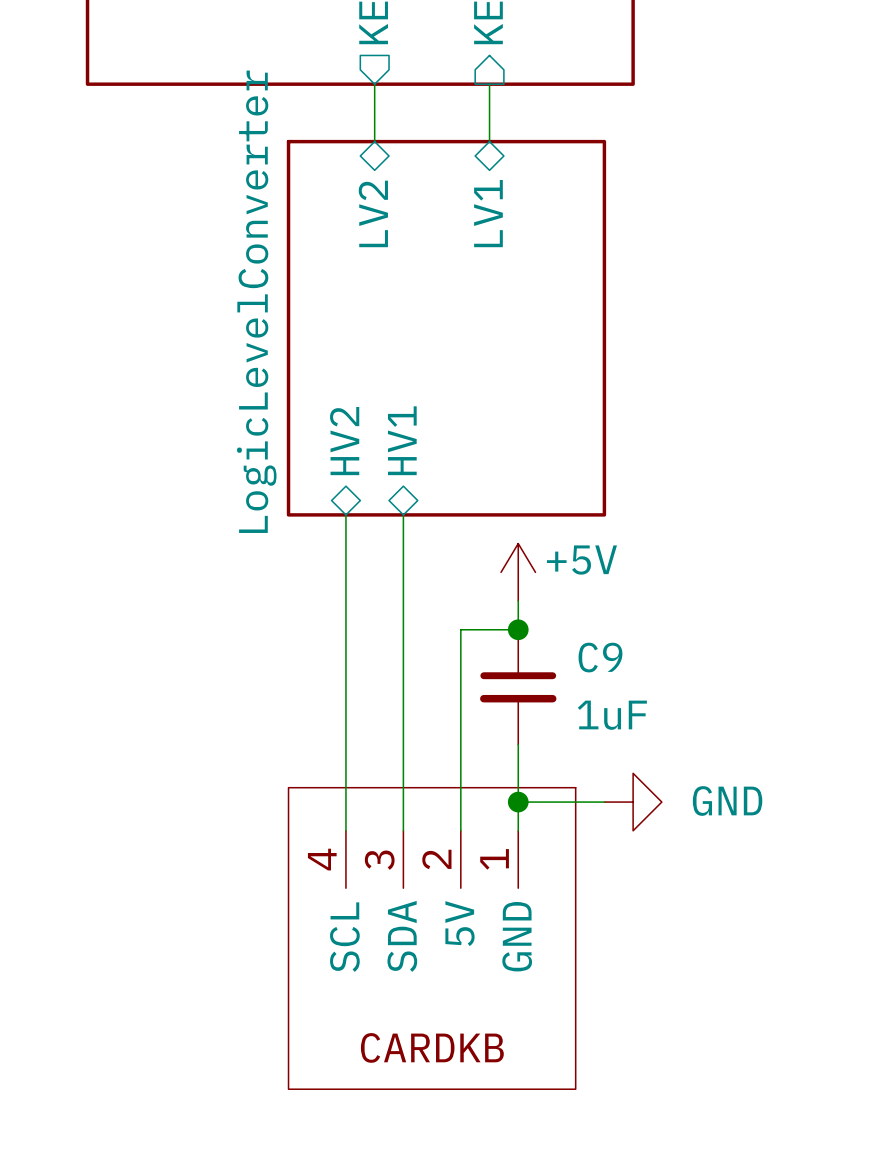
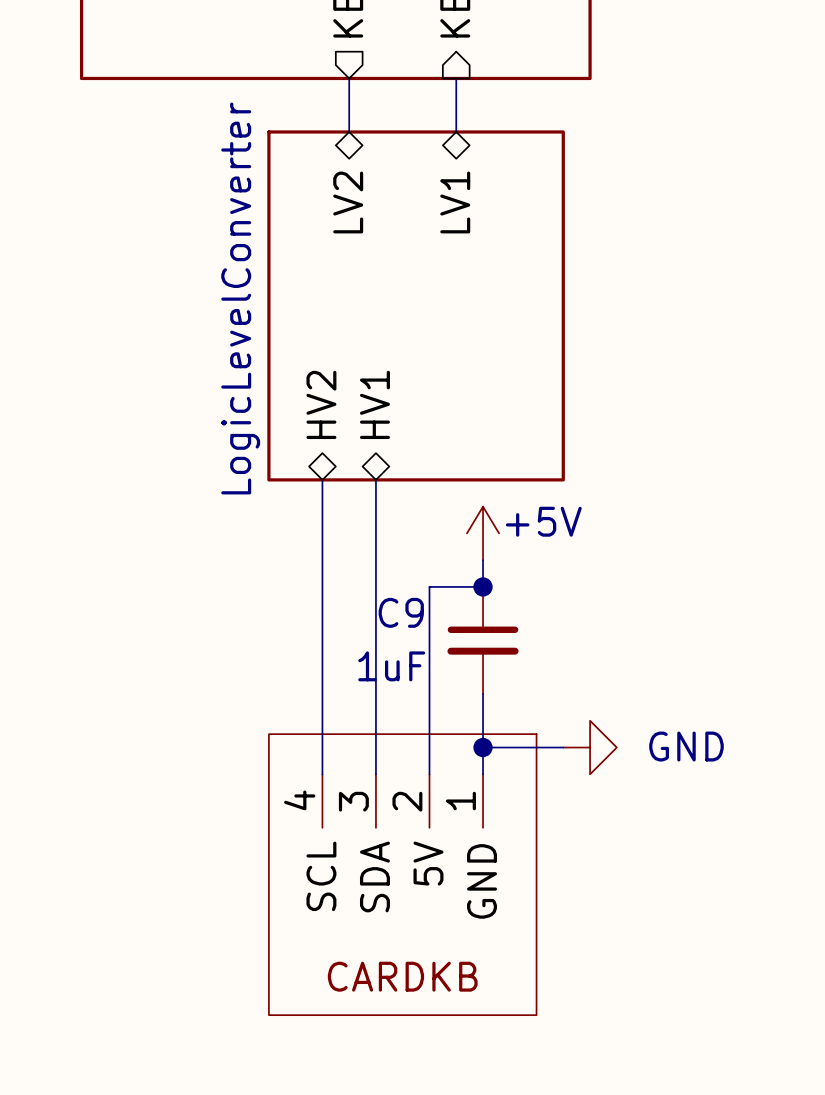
C9 name position: C9 (600, 657) -> C9 (401, 612)
C9 value position: 1uF (612, 715) -> 1uF (391, 666)

